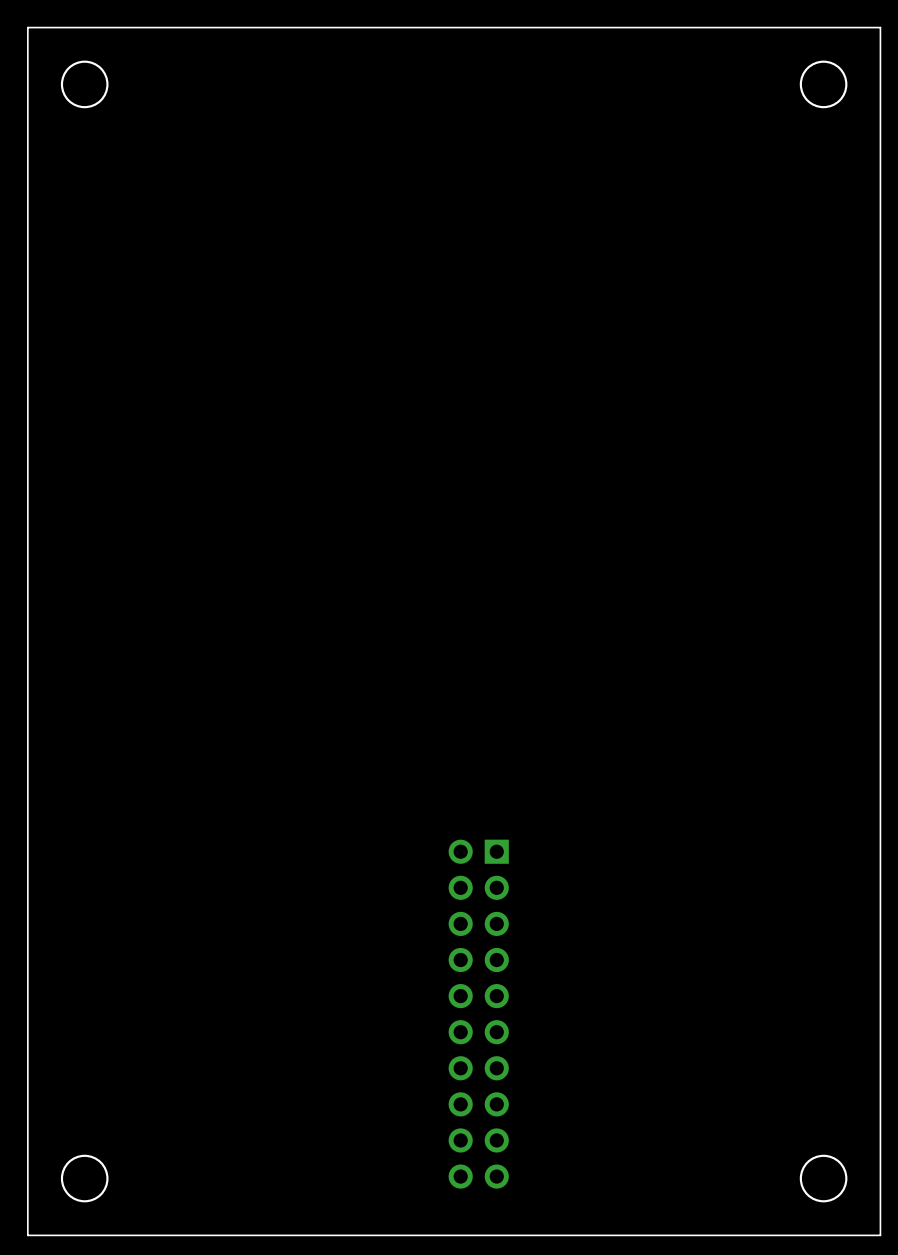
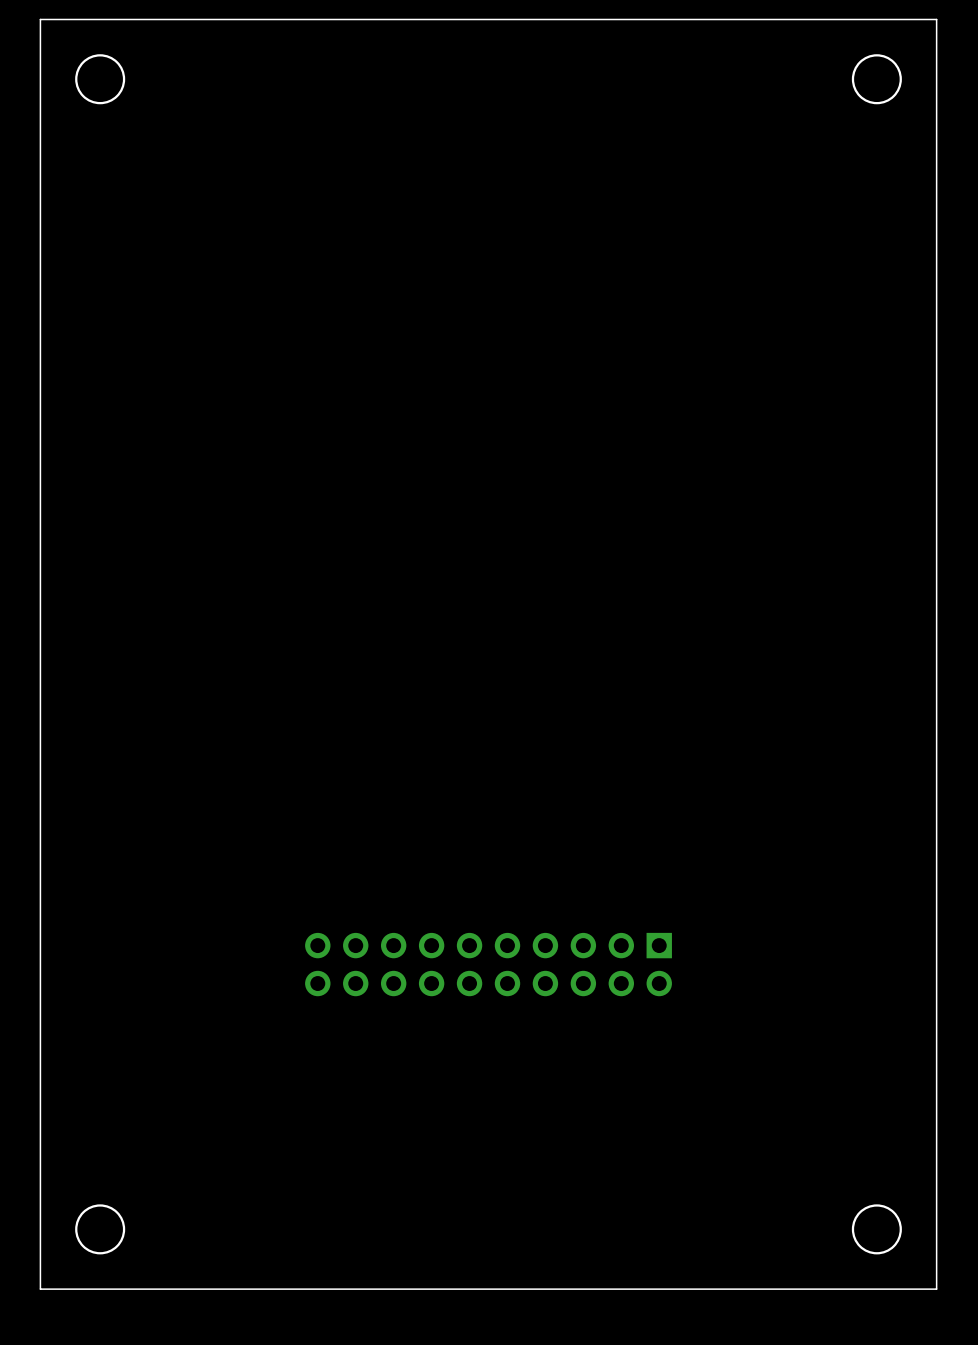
part: none -> (488, 964)
part: (478, 1014) -> none

